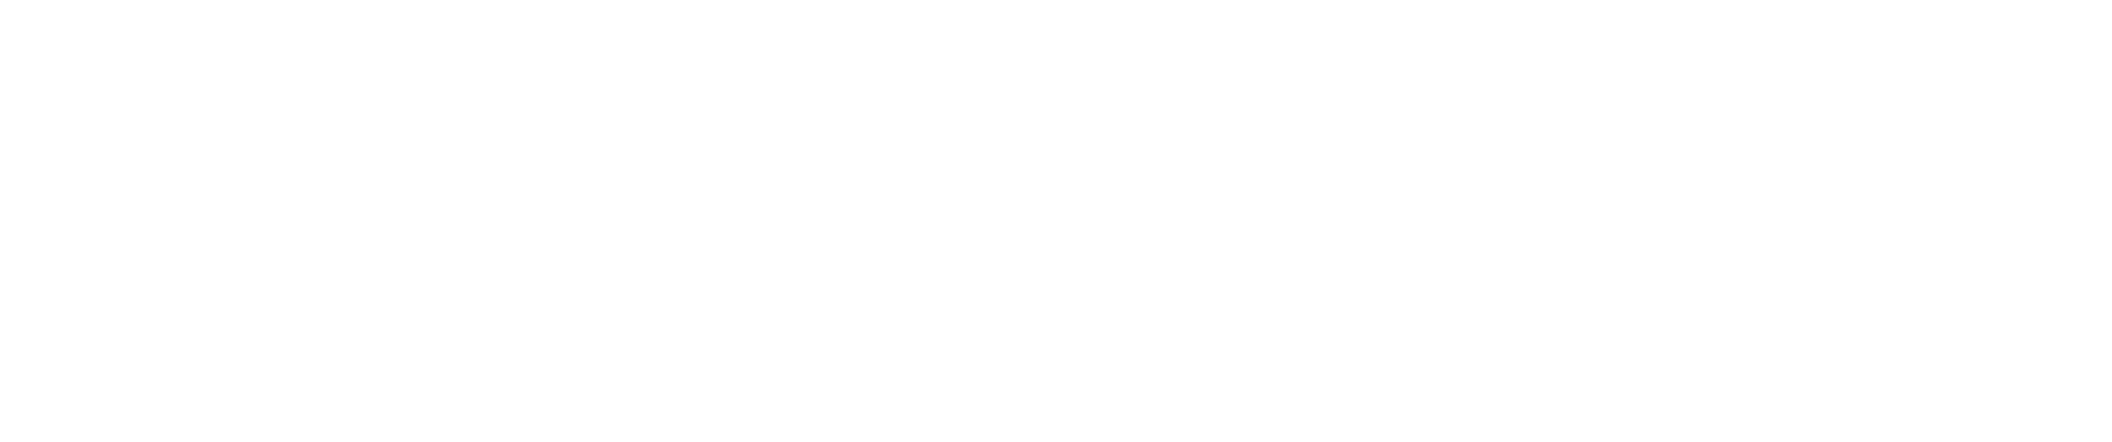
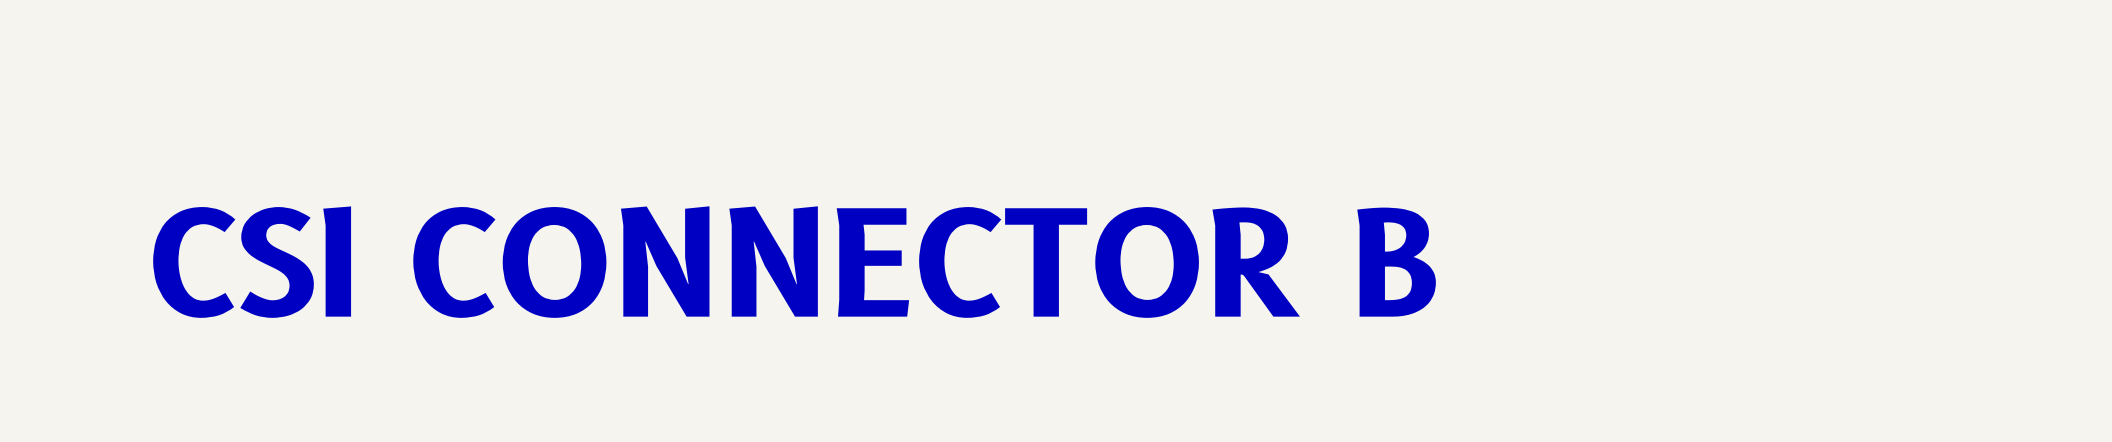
text: none -> CSI CONNECTOR B (794, 262)

